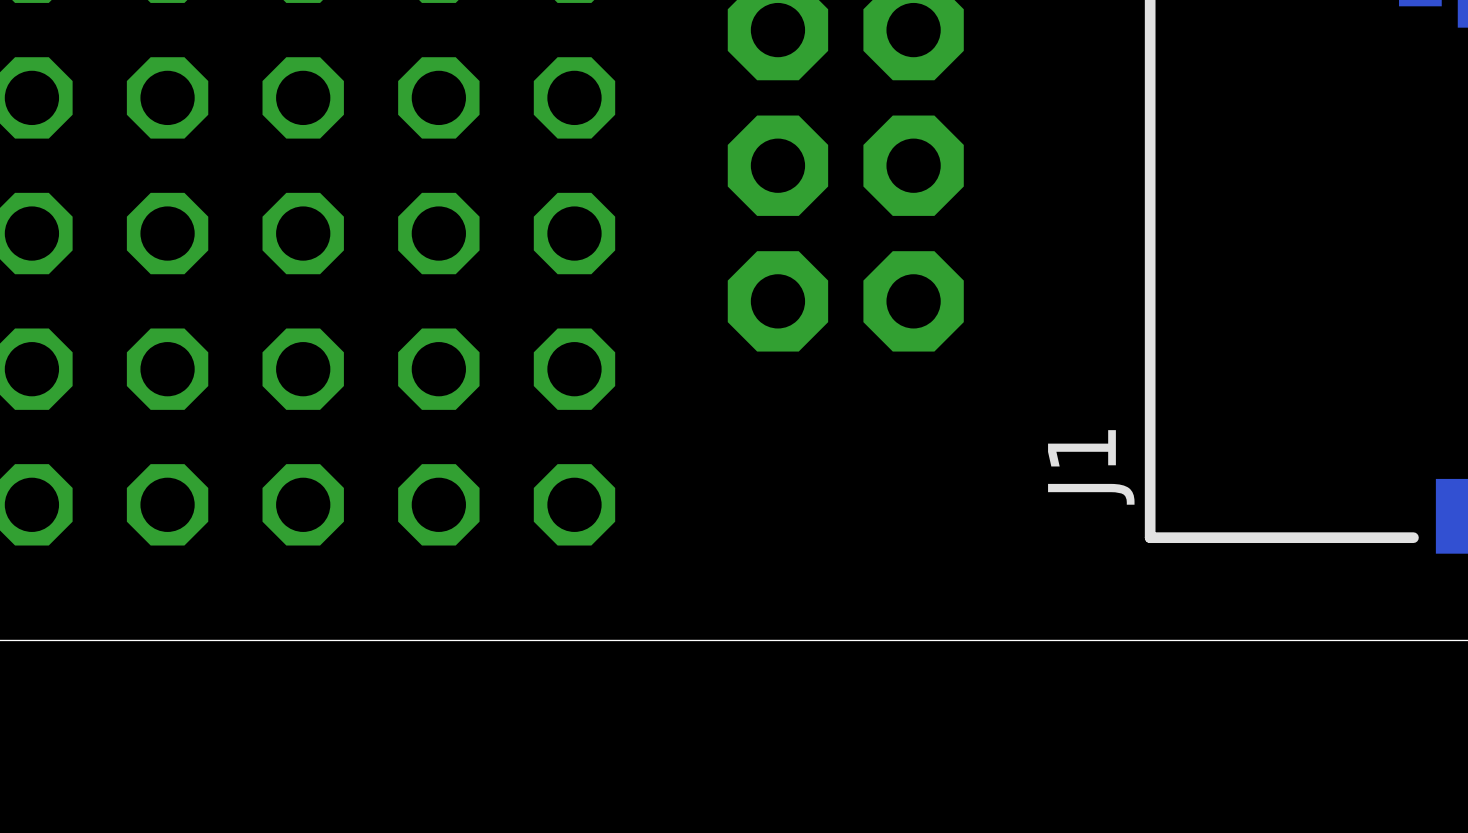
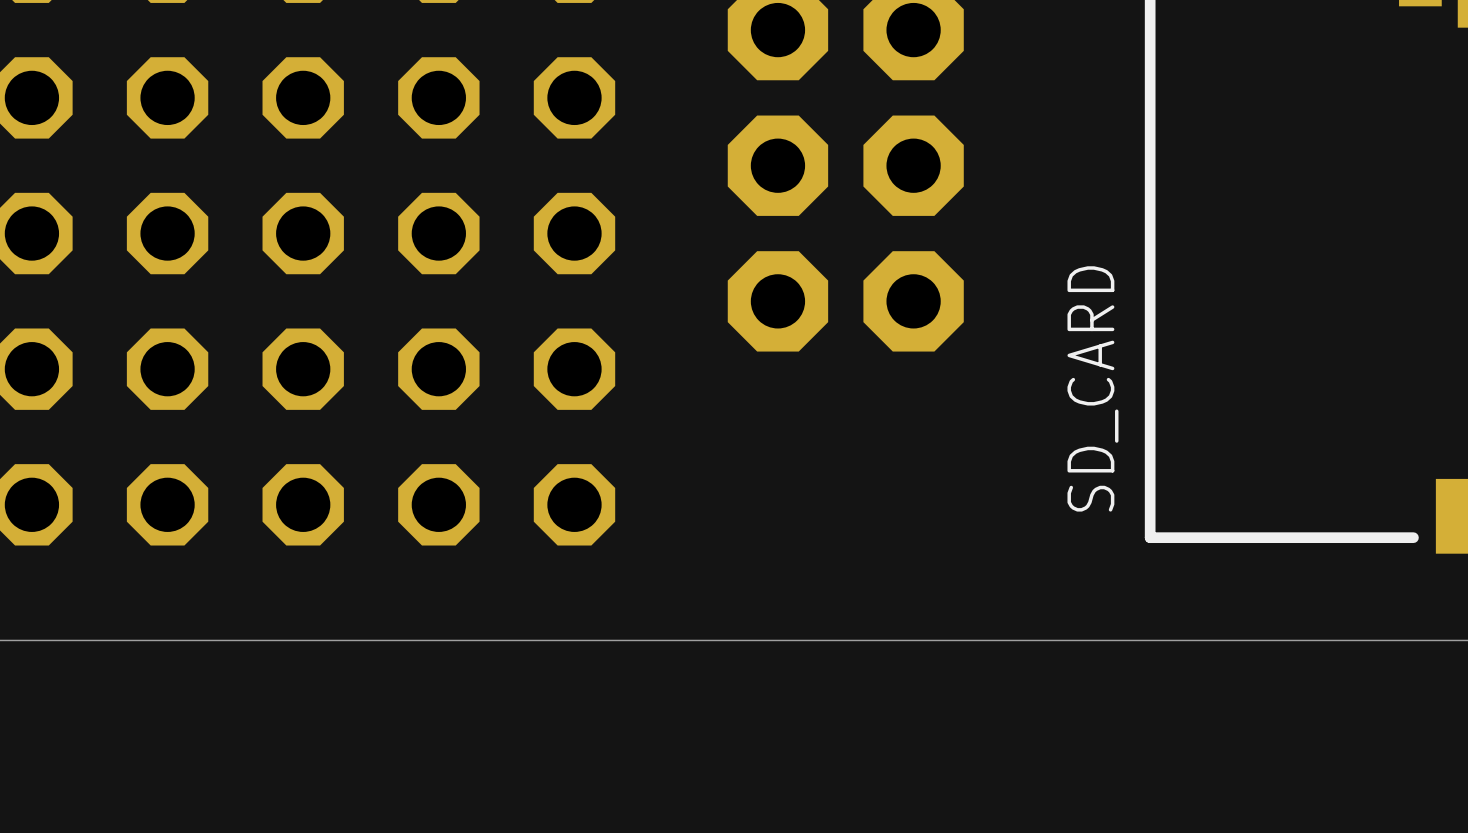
J1 name: J1 (1091, 467) -> SD_CARD (1092, 388)

